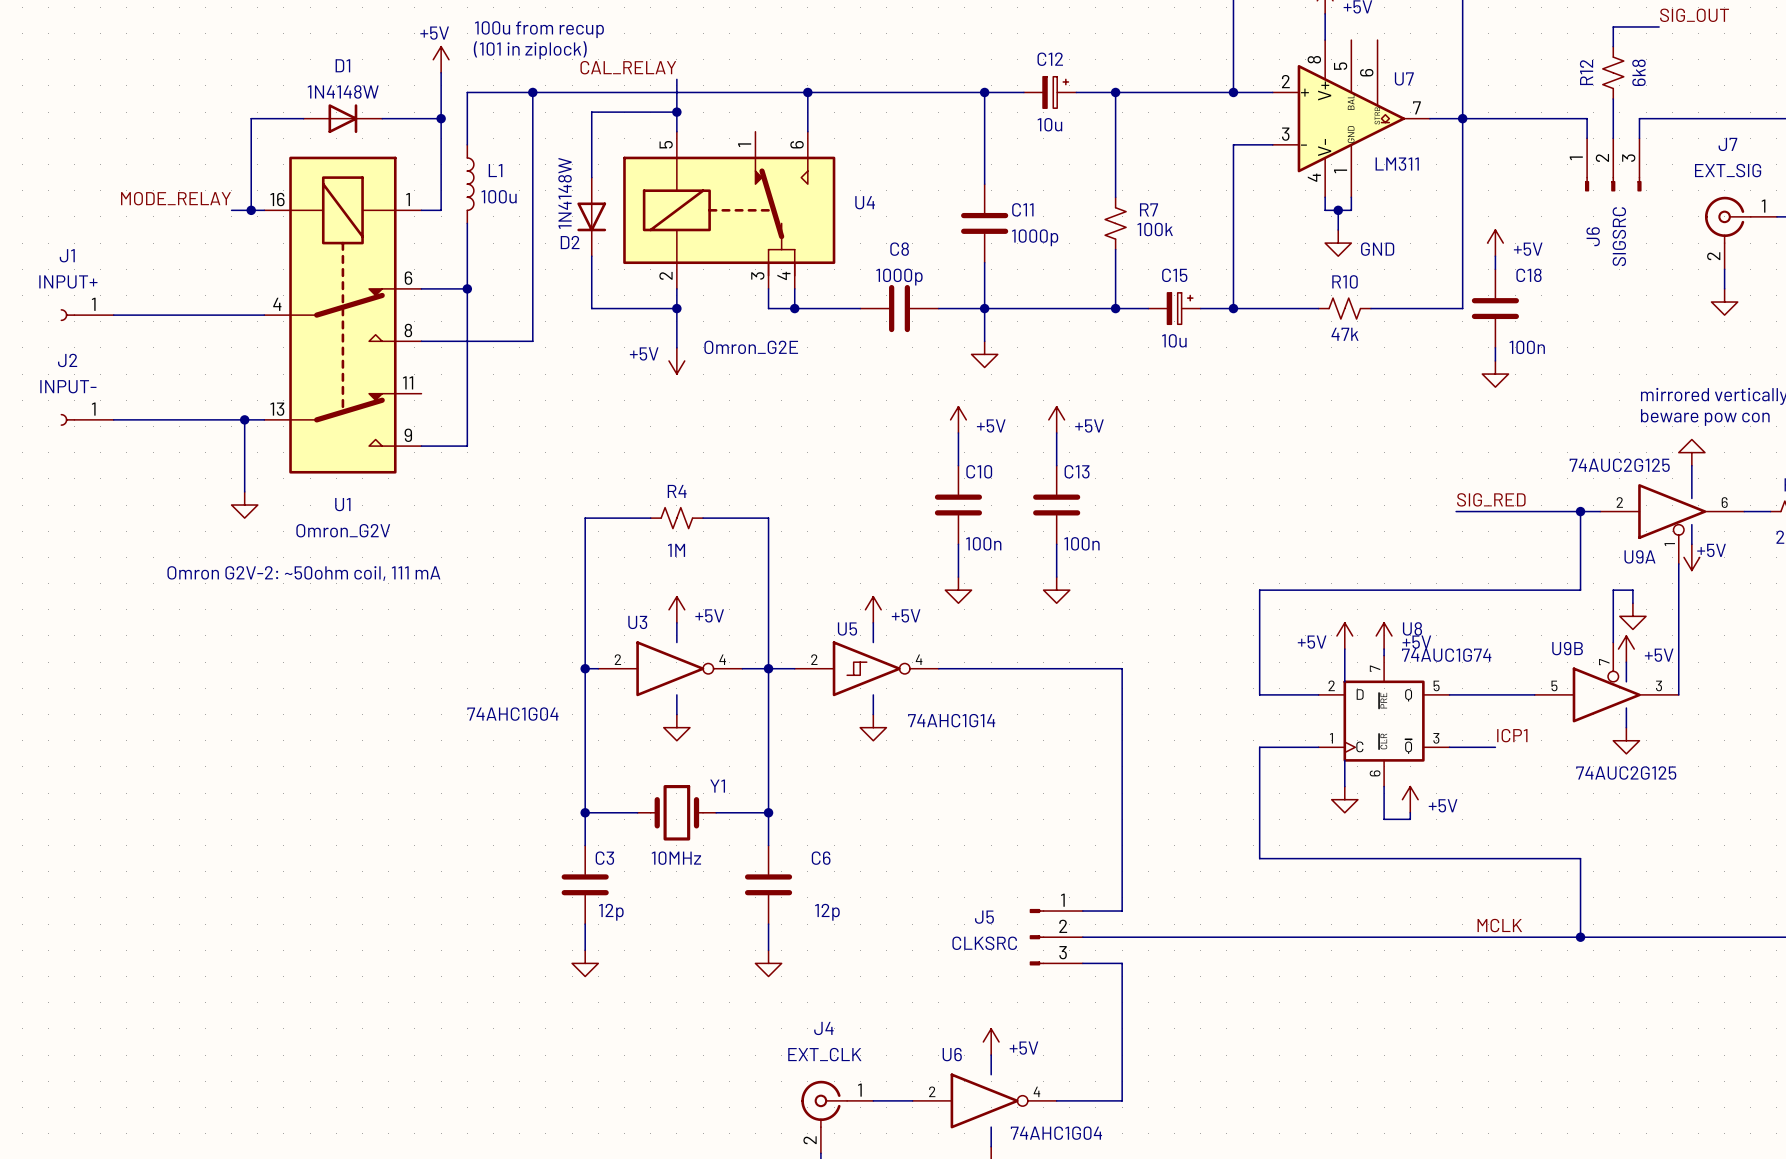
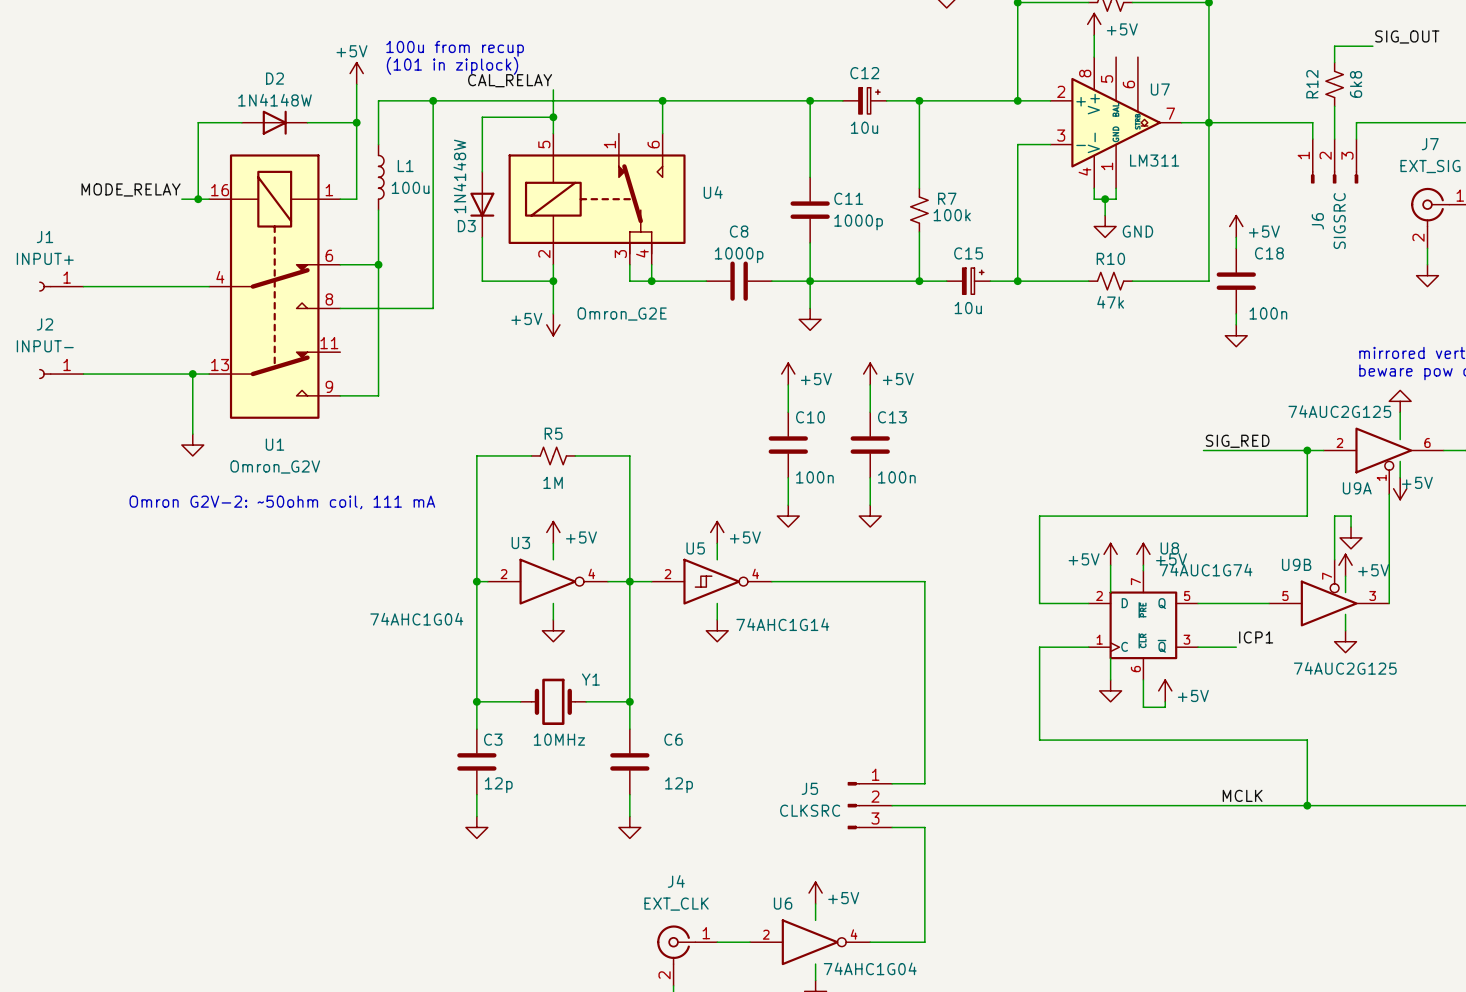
D1 name: D1 (342, 65) -> D2 (274, 78)
D2 name: D2 (570, 242) -> D3 (466, 226)
R4 name: R4 (677, 491) -> R5 (553, 433)

